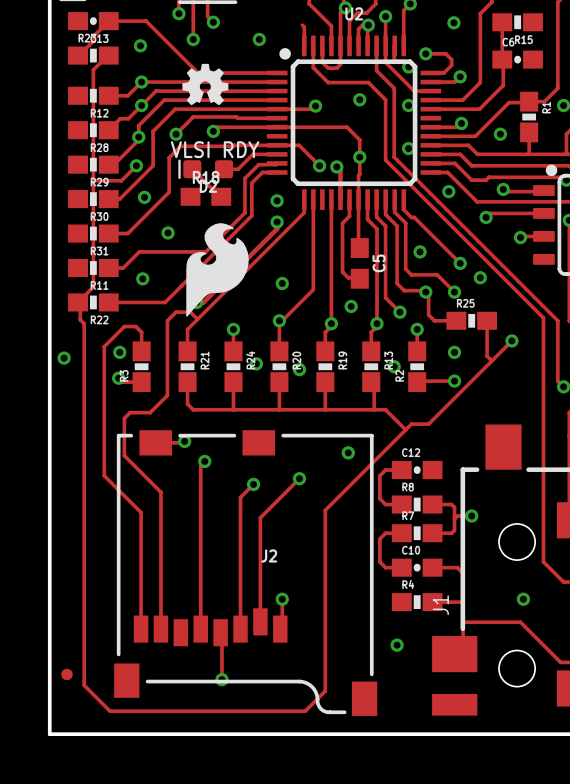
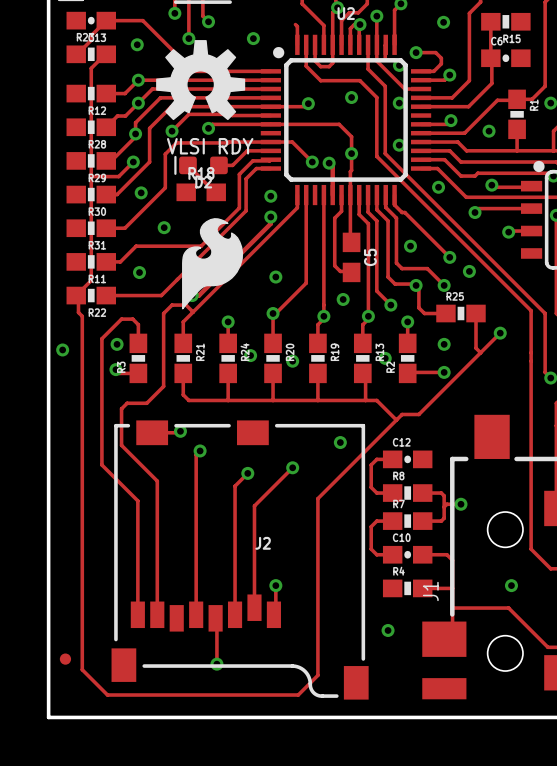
drawing shape: [182, 63, 229, 106] -> [156, 40, 246, 121]

